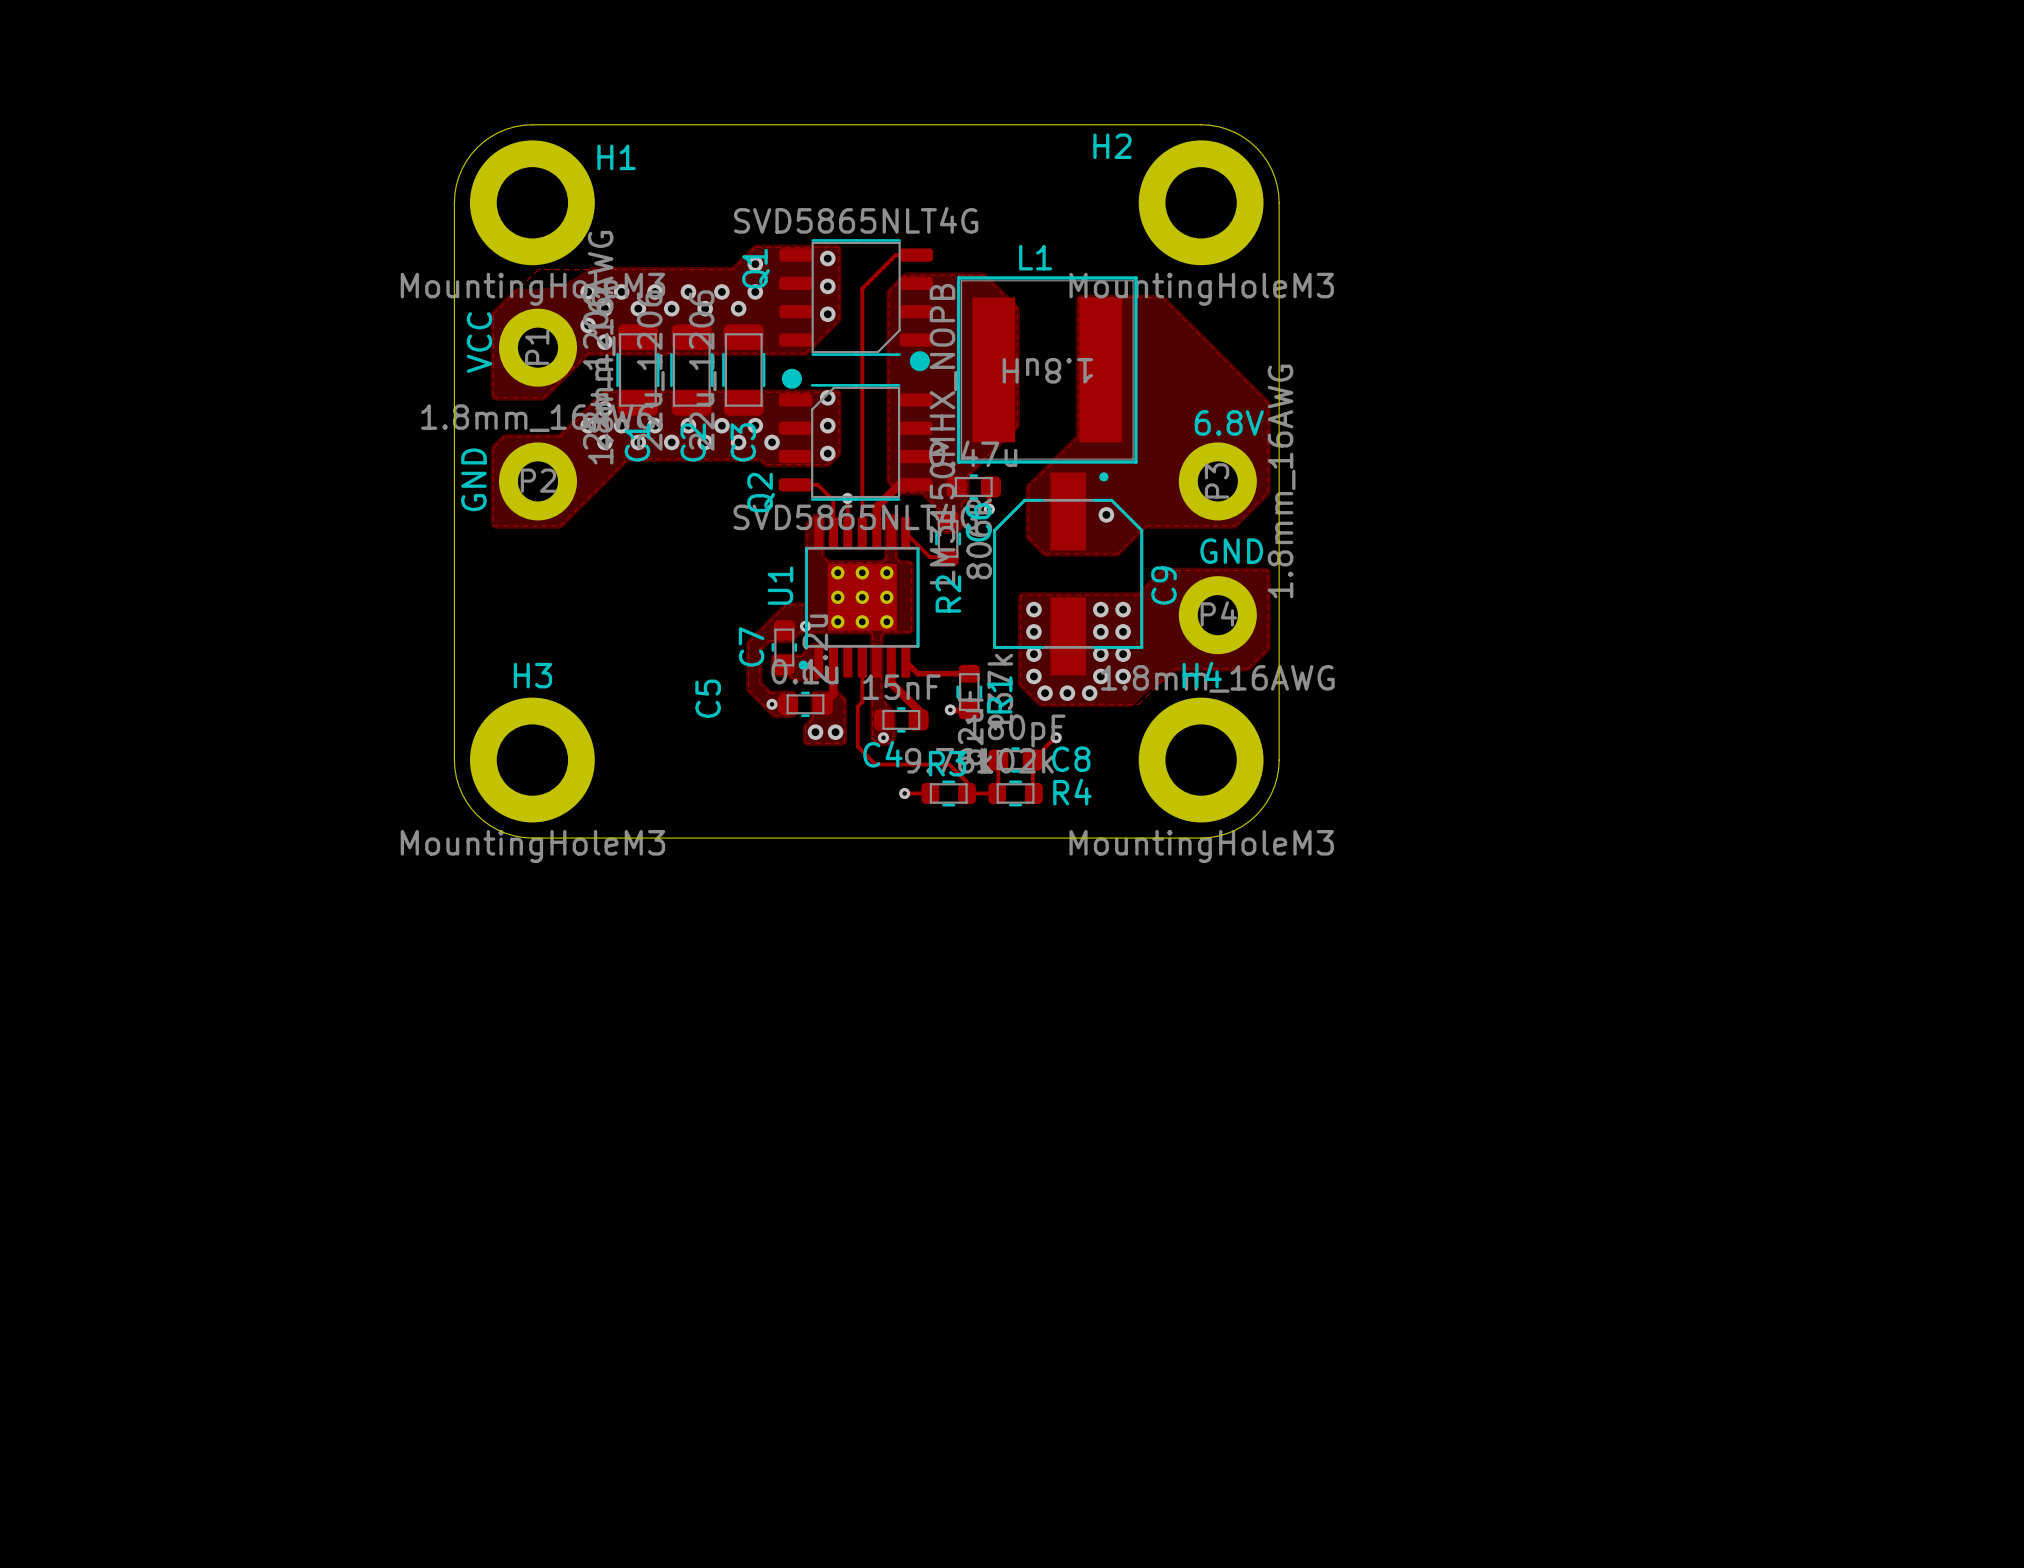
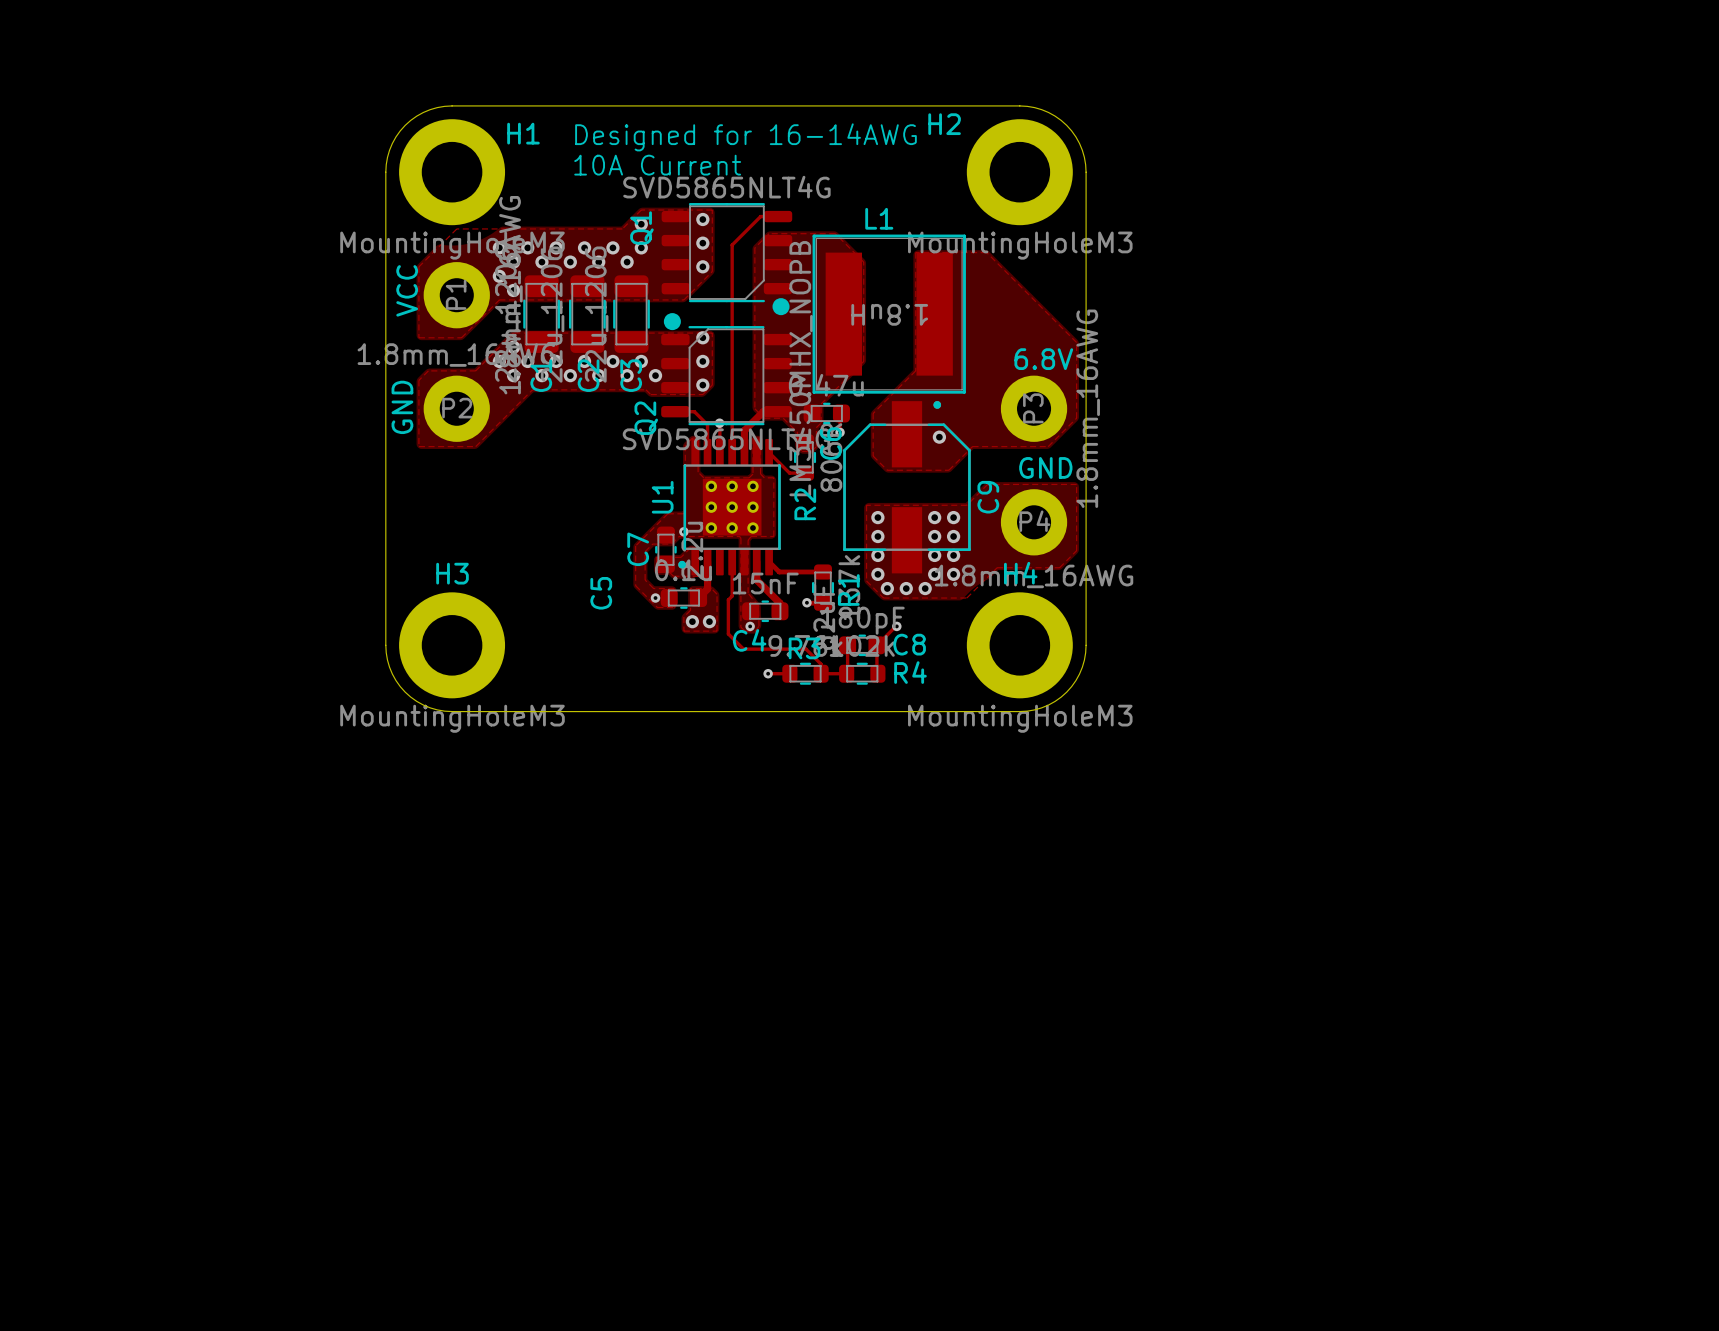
text: none -> Designed for 16-14AWG (745, 137)
text: none -> 10A Current (657, 165)

